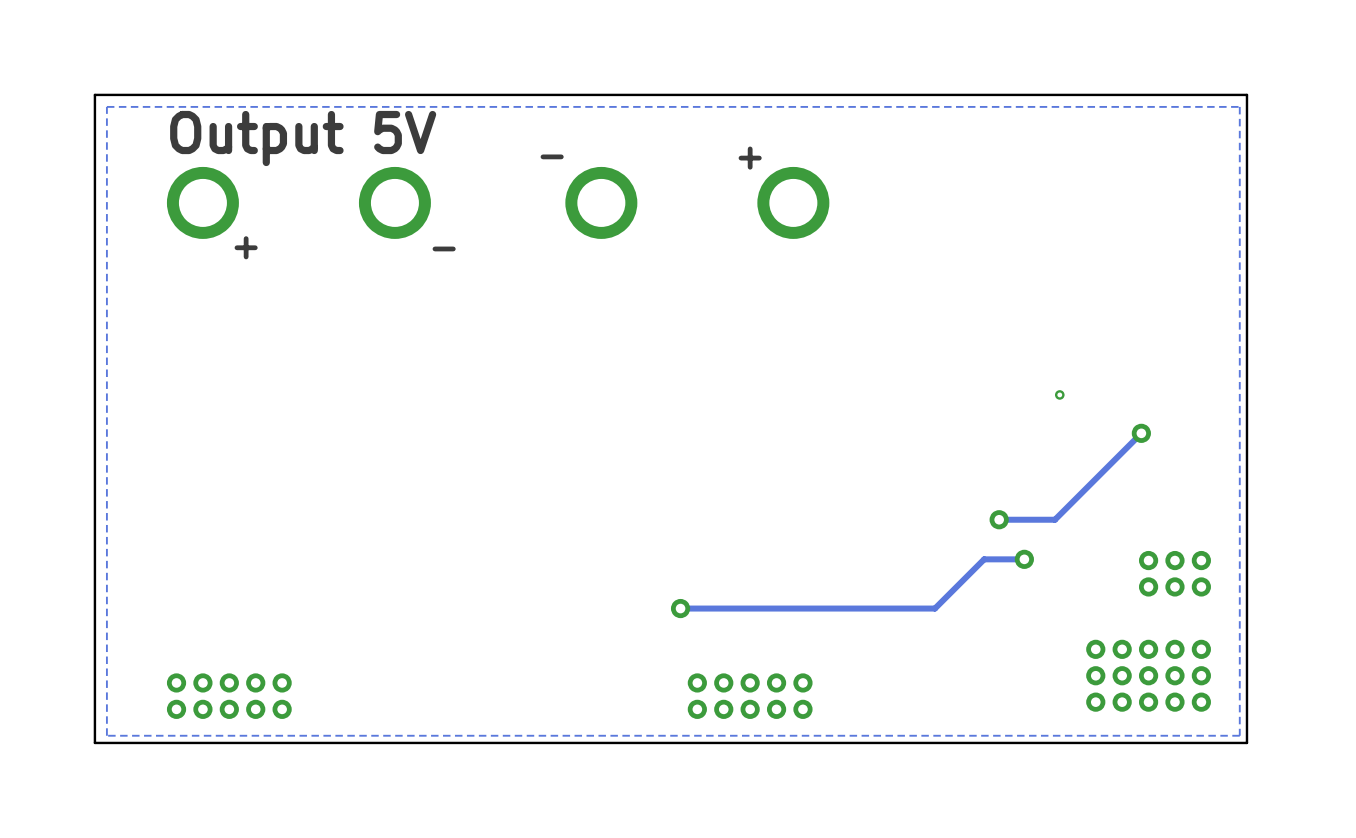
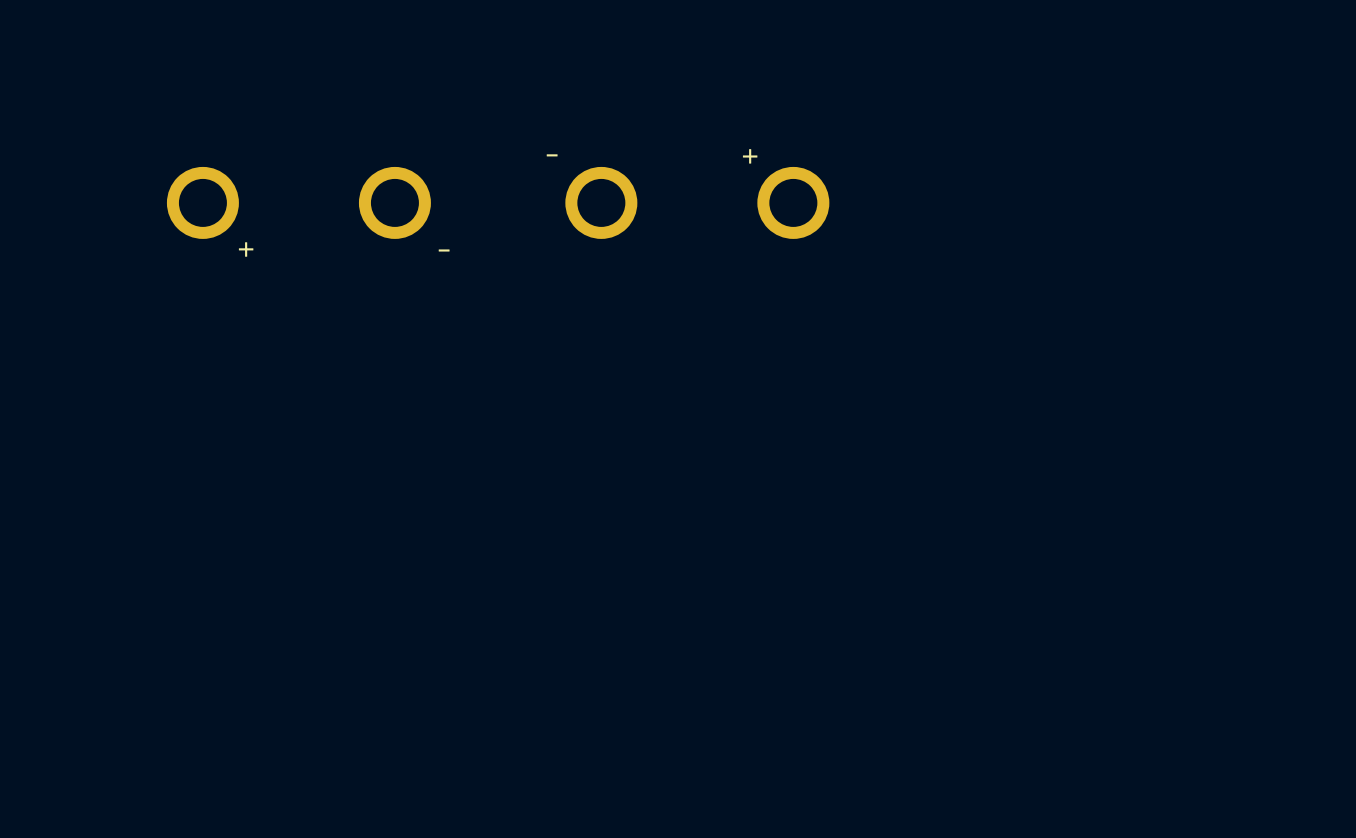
board edge: (1246, 94) (94, 94) (94, 742) (1246, 742) (1246, 94) -> none
zone outline: (1239, 106) (106, 106) (106, 735) (1239, 735) (1239, 106) -> none
text: Output 5V (303, 138) -> none
via: (1059, 394) -> none
track: (1141, 433) (1054, 519) (999, 519) -> none
via: (1141, 433) -> none
via: (999, 519) -> none
track: (1024, 559) (984, 559) (934, 608) (680, 608) -> none
via: (1024, 559) -> none
via: (1148, 560) -> none
via: (1174, 560) -> none
via: (1201, 560) -> none
via: (1148, 586) -> none
via: (1174, 586) -> none
via: (1201, 586) -> none
via: (680, 608) -> none
via: (1095, 649) -> none
via: (1122, 649) -> none
via: (1148, 649) -> none
via: (1174, 649) -> none
via: (1201, 649) -> none
via: (1095, 675) -> none
via: (1122, 675) -> none
via: (1148, 675) -> none
via: (1174, 675) -> none
via: (1201, 675) -> none
via: (176, 682) -> none
via: (202, 682) -> none
via: (229, 682) -> none
via: (255, 682) -> none
via: (282, 682) -> none
via: (697, 682) -> none
via: (723, 682) -> none
via: (750, 682) -> none
via: (776, 682) -> none
via: (802, 682) -> none
via: (1095, 702) -> none
via: (1122, 702) -> none
via: (1148, 702) -> none
via: (1174, 702) -> none
via: (1201, 702) -> none
via: (176, 709) -> none
via: (202, 709) -> none
via: (229, 709) -> none
via: (255, 709) -> none
via: (282, 709) -> none
via: (697, 709) -> none
via: (723, 709) -> none
via: (750, 709) -> none
via: (776, 709) -> none
via: (802, 709) -> none

